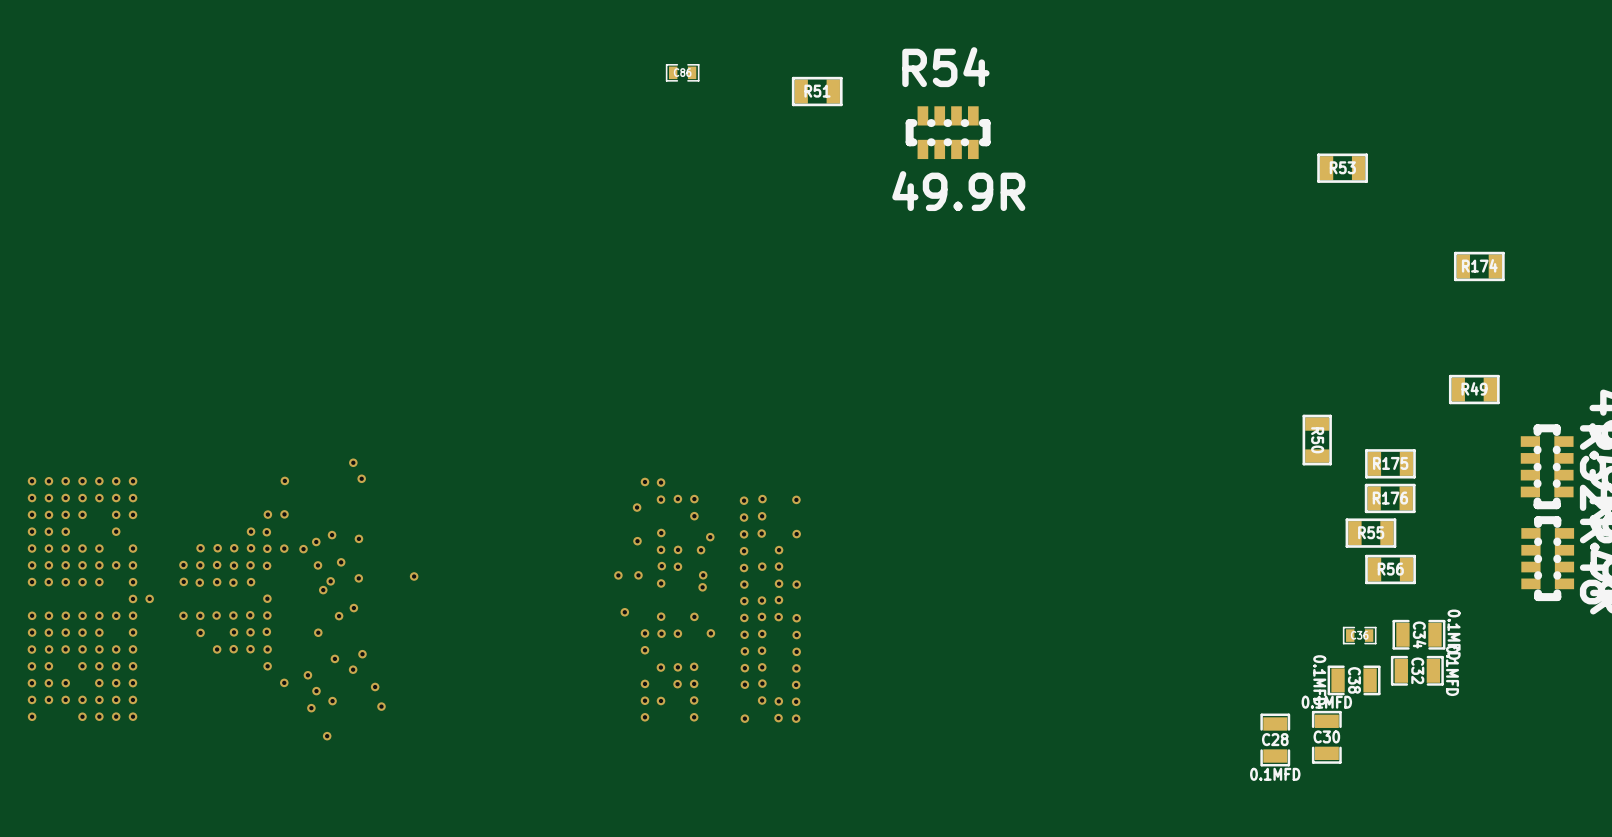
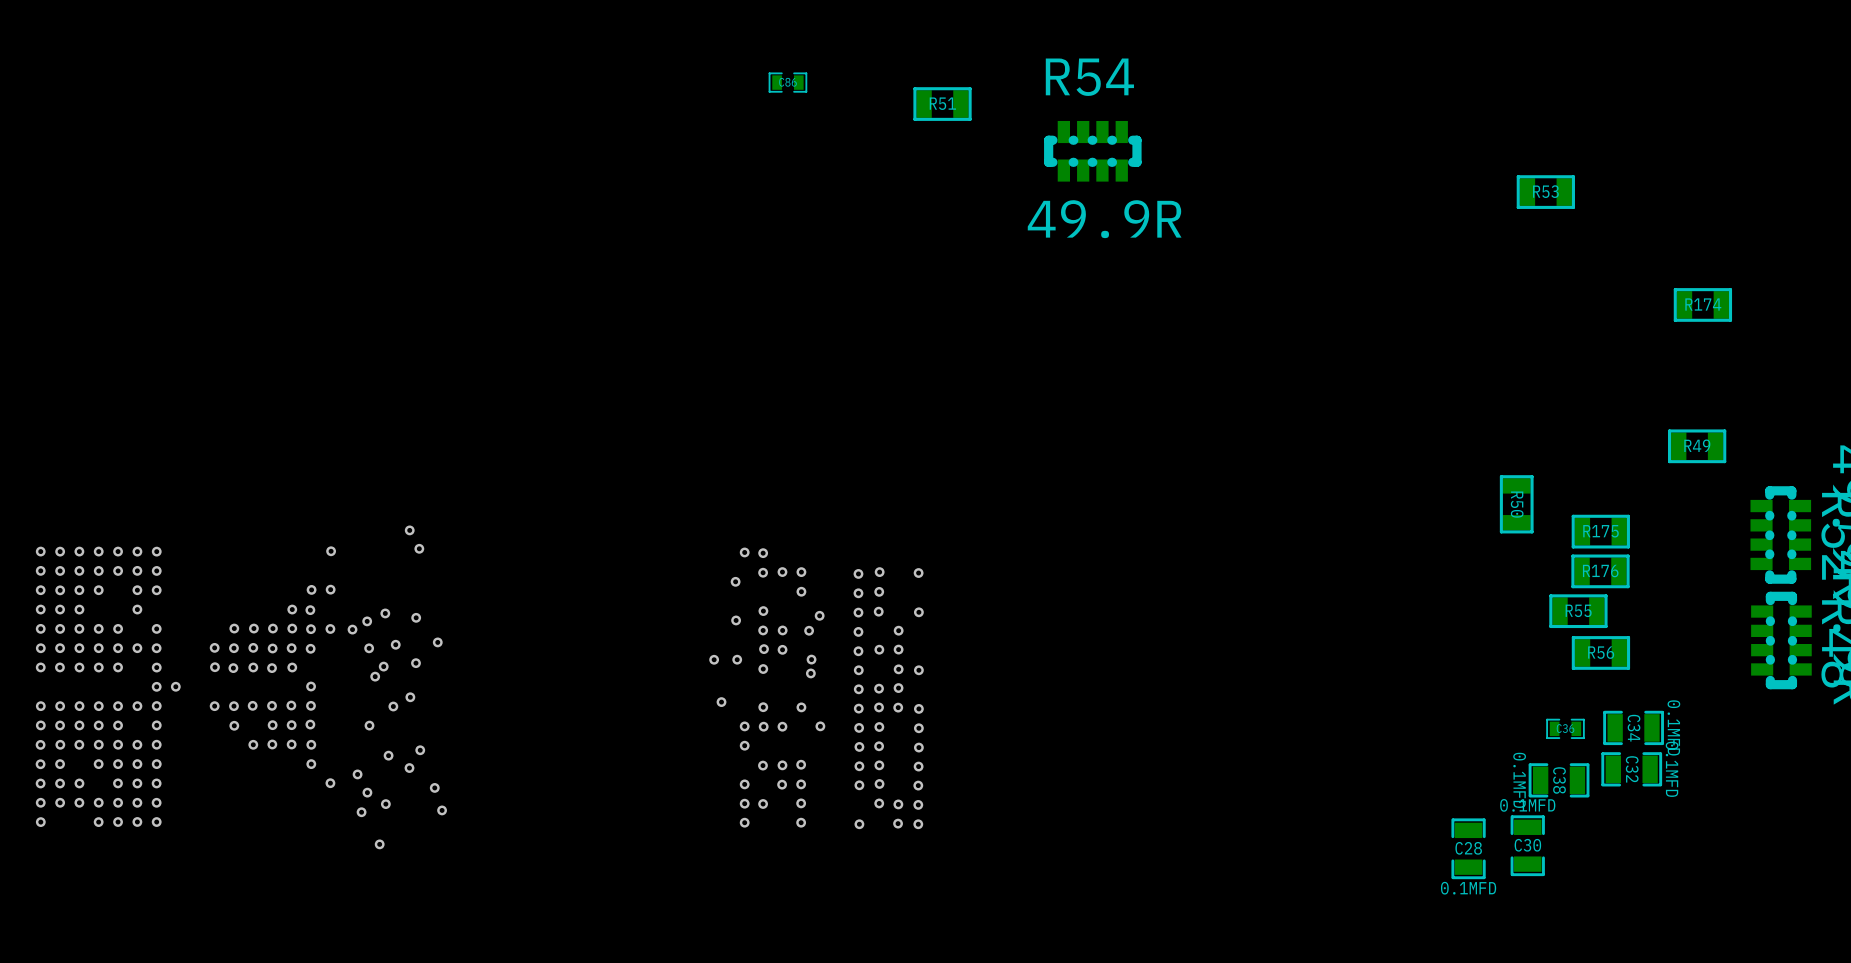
via position: (414, 576) -> (437, 642)

